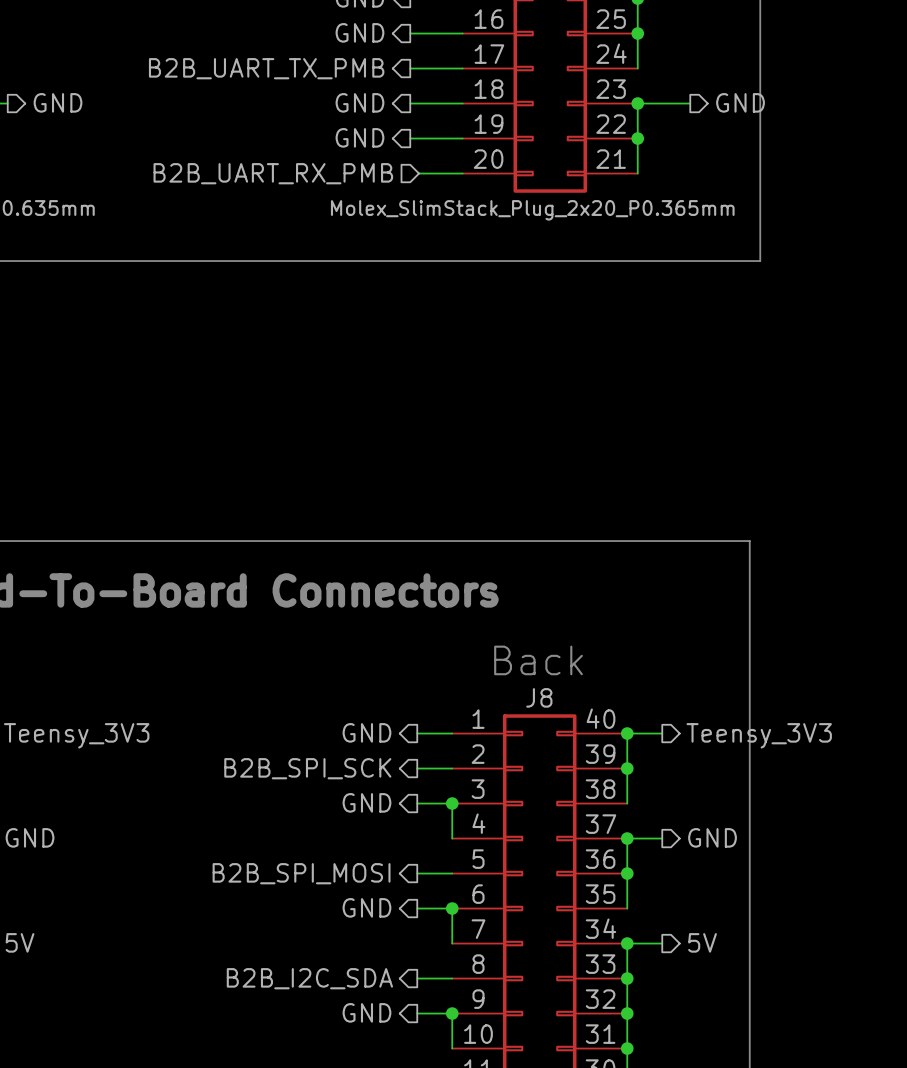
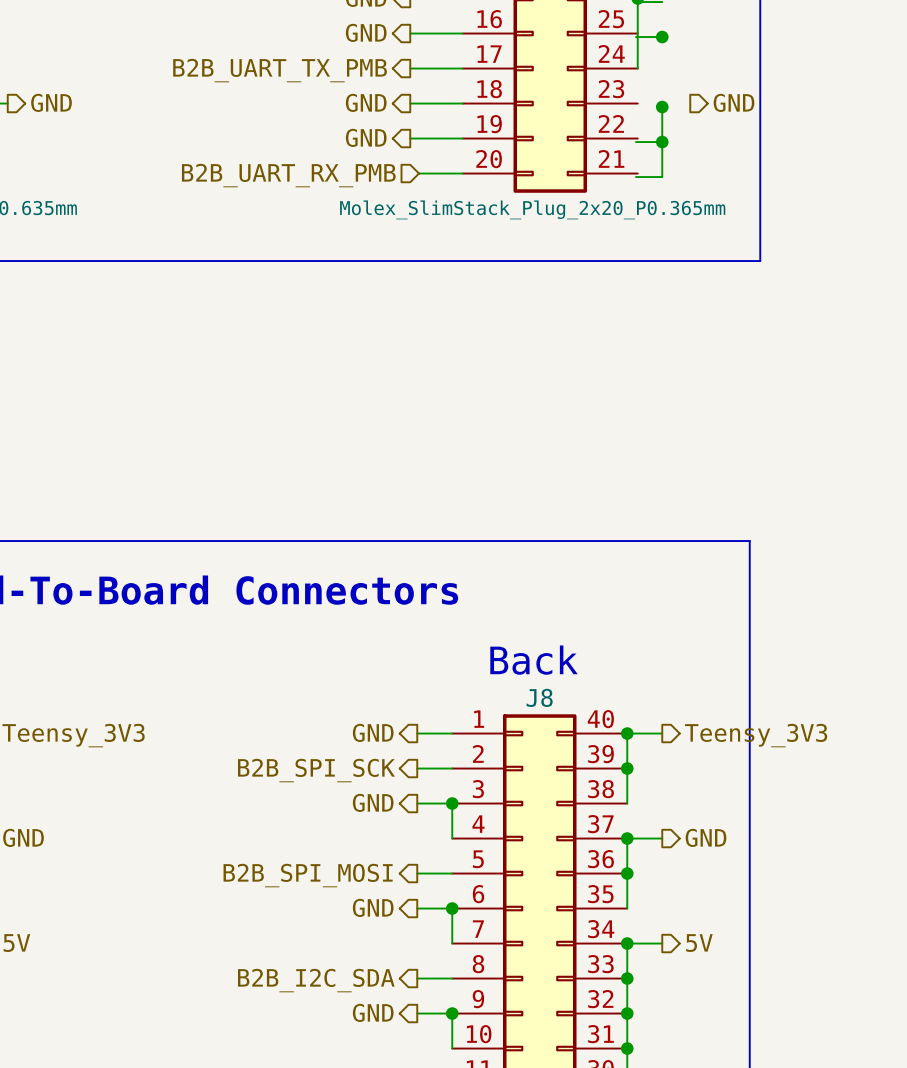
wire: none -> (636, 2) (662, 2)
junction position: (637, 33) -> (662, 37)
wire: none -> (636, 37) (662, 37)
junction: (637, 103) -> none
wire: (690, 103) (637, 103) (637, 173) -> none
wire: none -> (662, 107) (662, 177) (636, 177)
junction: none -> (662, 107)
junction: (637, 138) -> none
wire: none -> (636, 142) (662, 142)
junction: none -> (662, 142)

